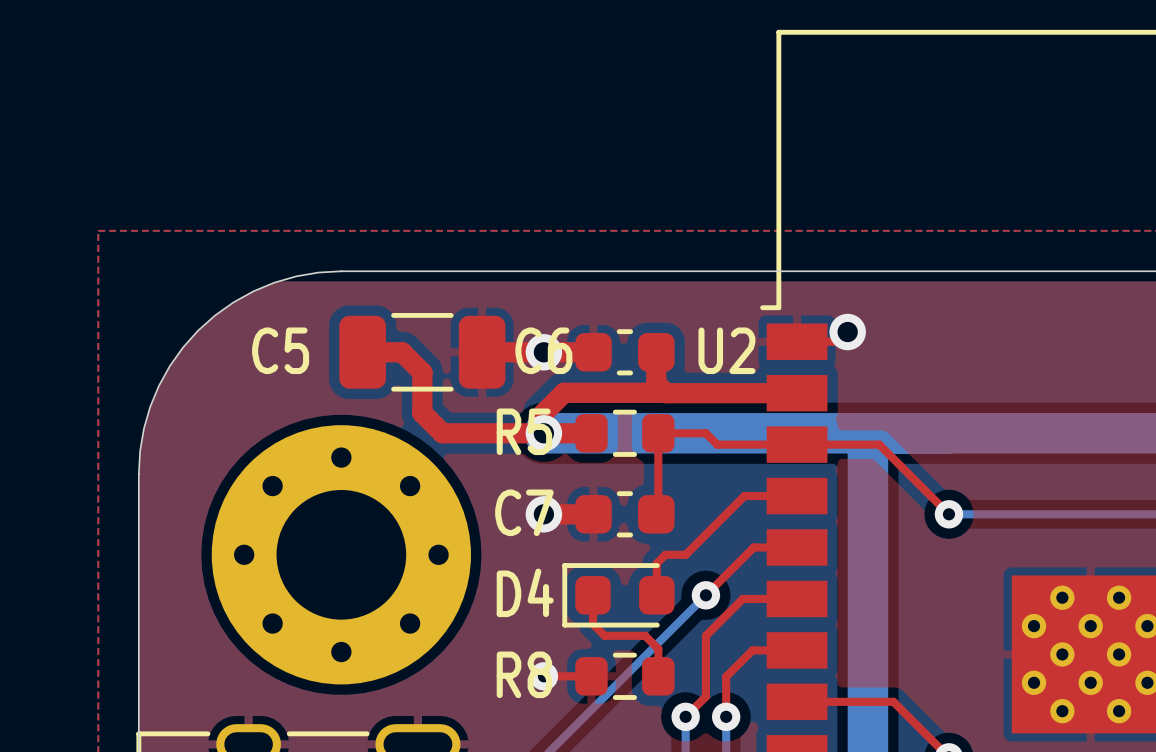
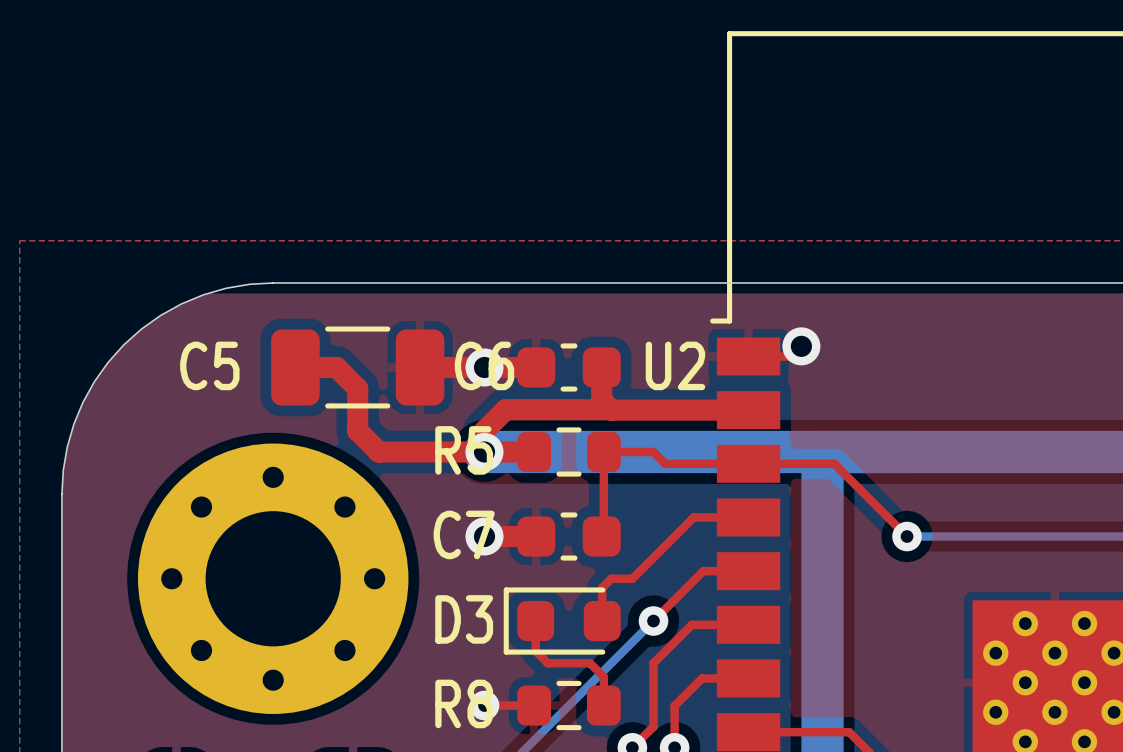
D4 name: D4 (525, 592) -> D3 (464, 619)

